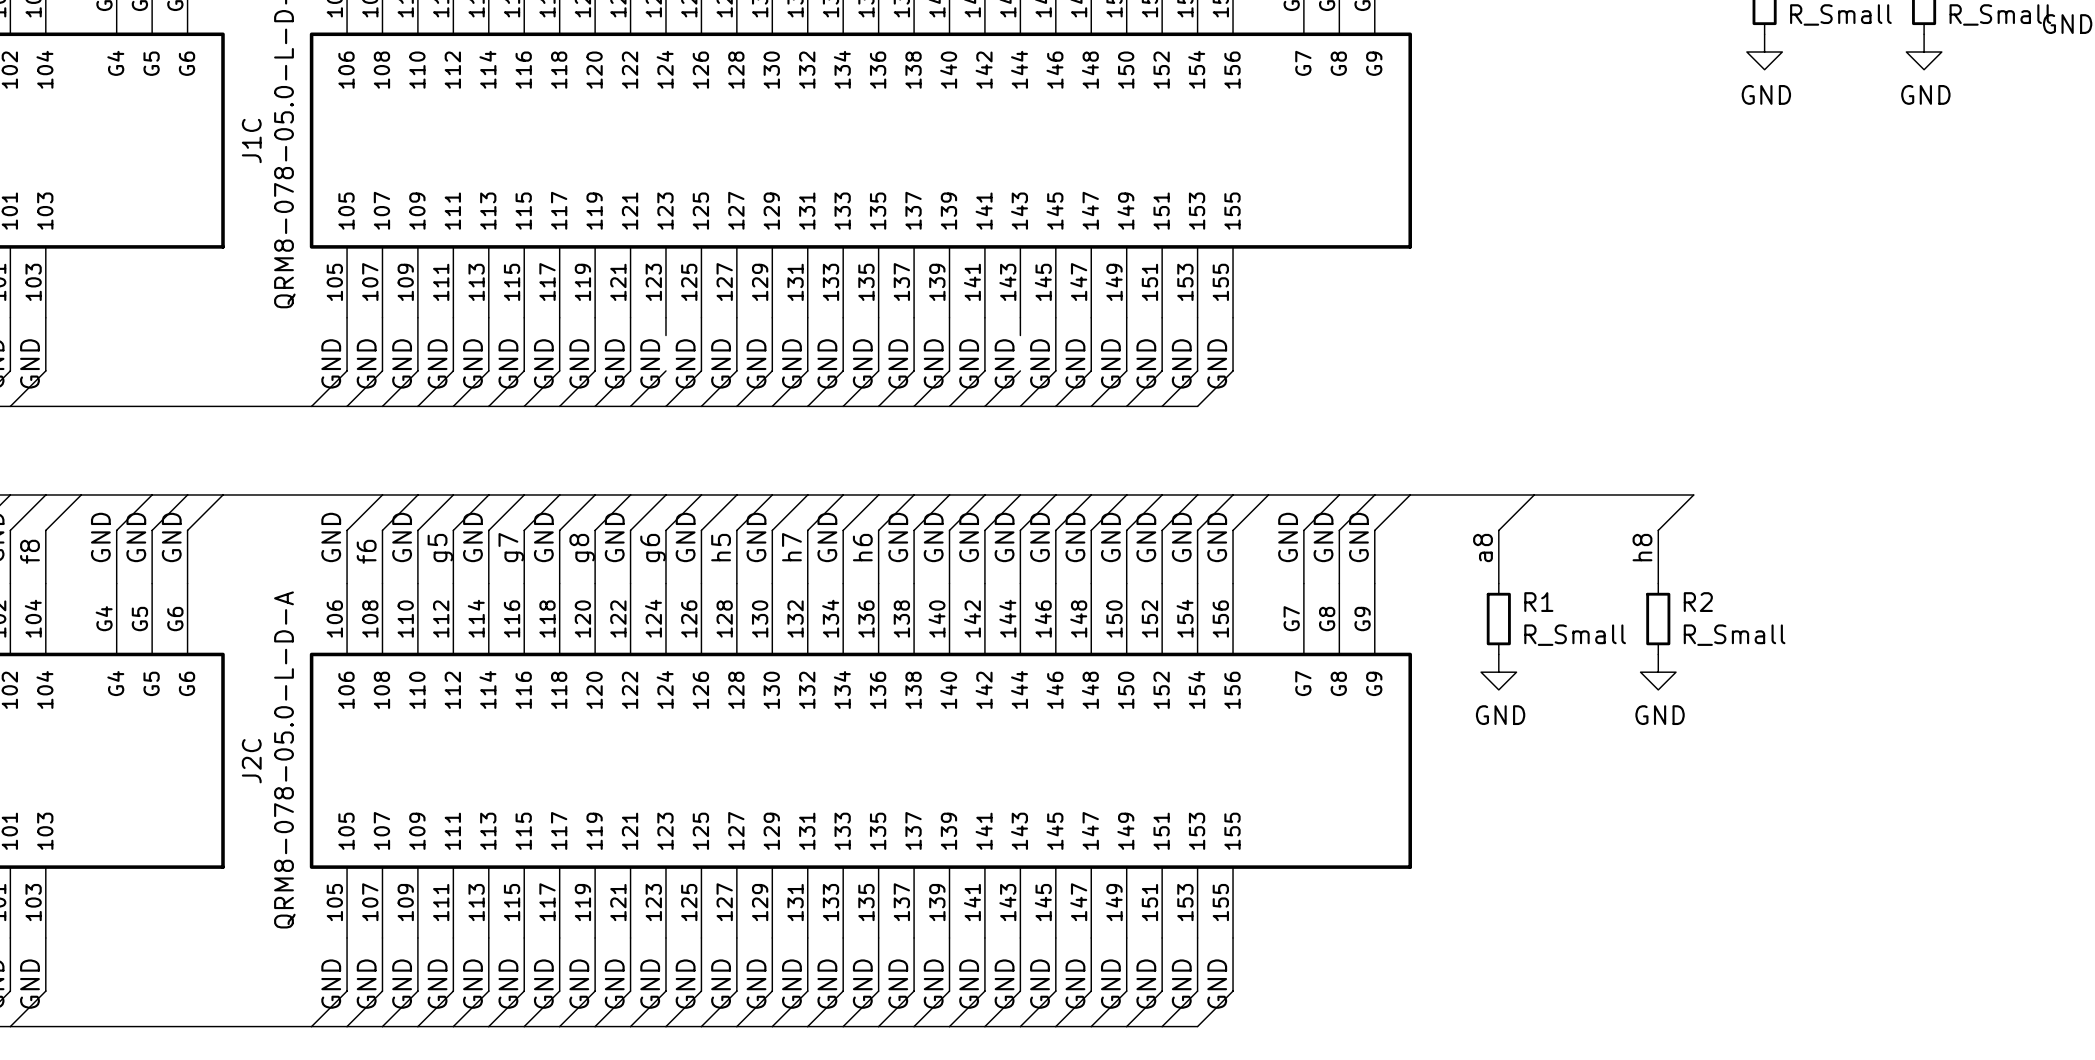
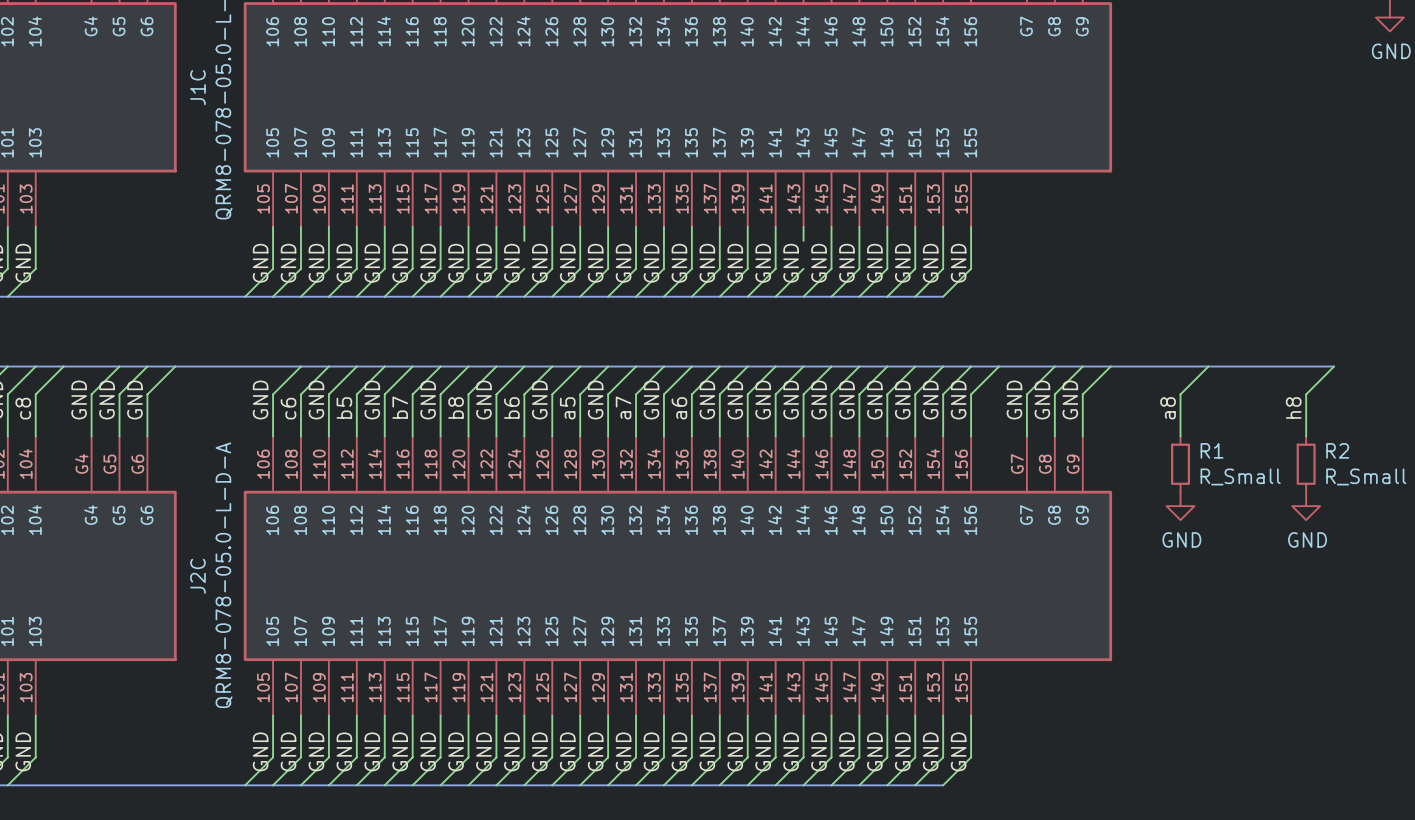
label: g7 (511, 547) -> b7 (400, 407)
label: h5 (721, 547) -> a5 (567, 408)
label: h7 (791, 547) -> a7 (623, 407)
label: h6 (862, 547) -> a6 (679, 408)
label: g5 (440, 548) -> b5 (344, 407)
label: g8 (582, 548) -> b8 (456, 407)
label: g6 (653, 548) -> b6 (511, 407)
label: f8 (29, 551) -> c8 (23, 408)
label: f6 (366, 551) -> c6 (288, 408)

